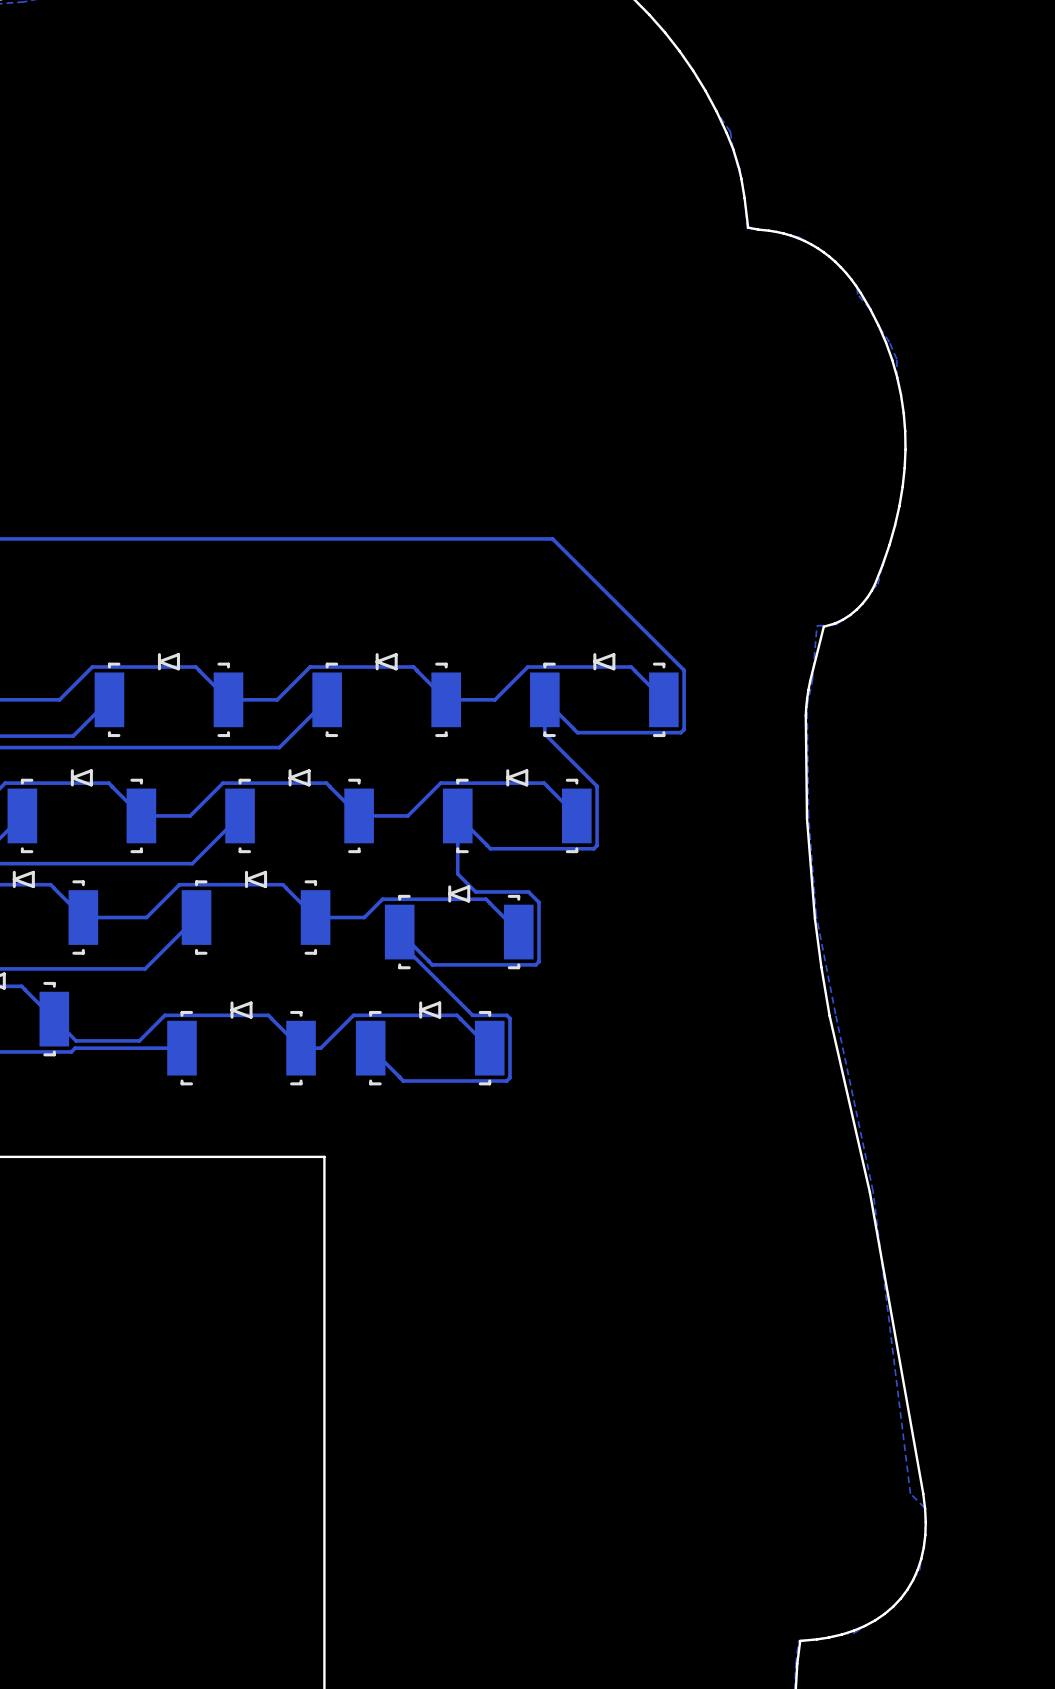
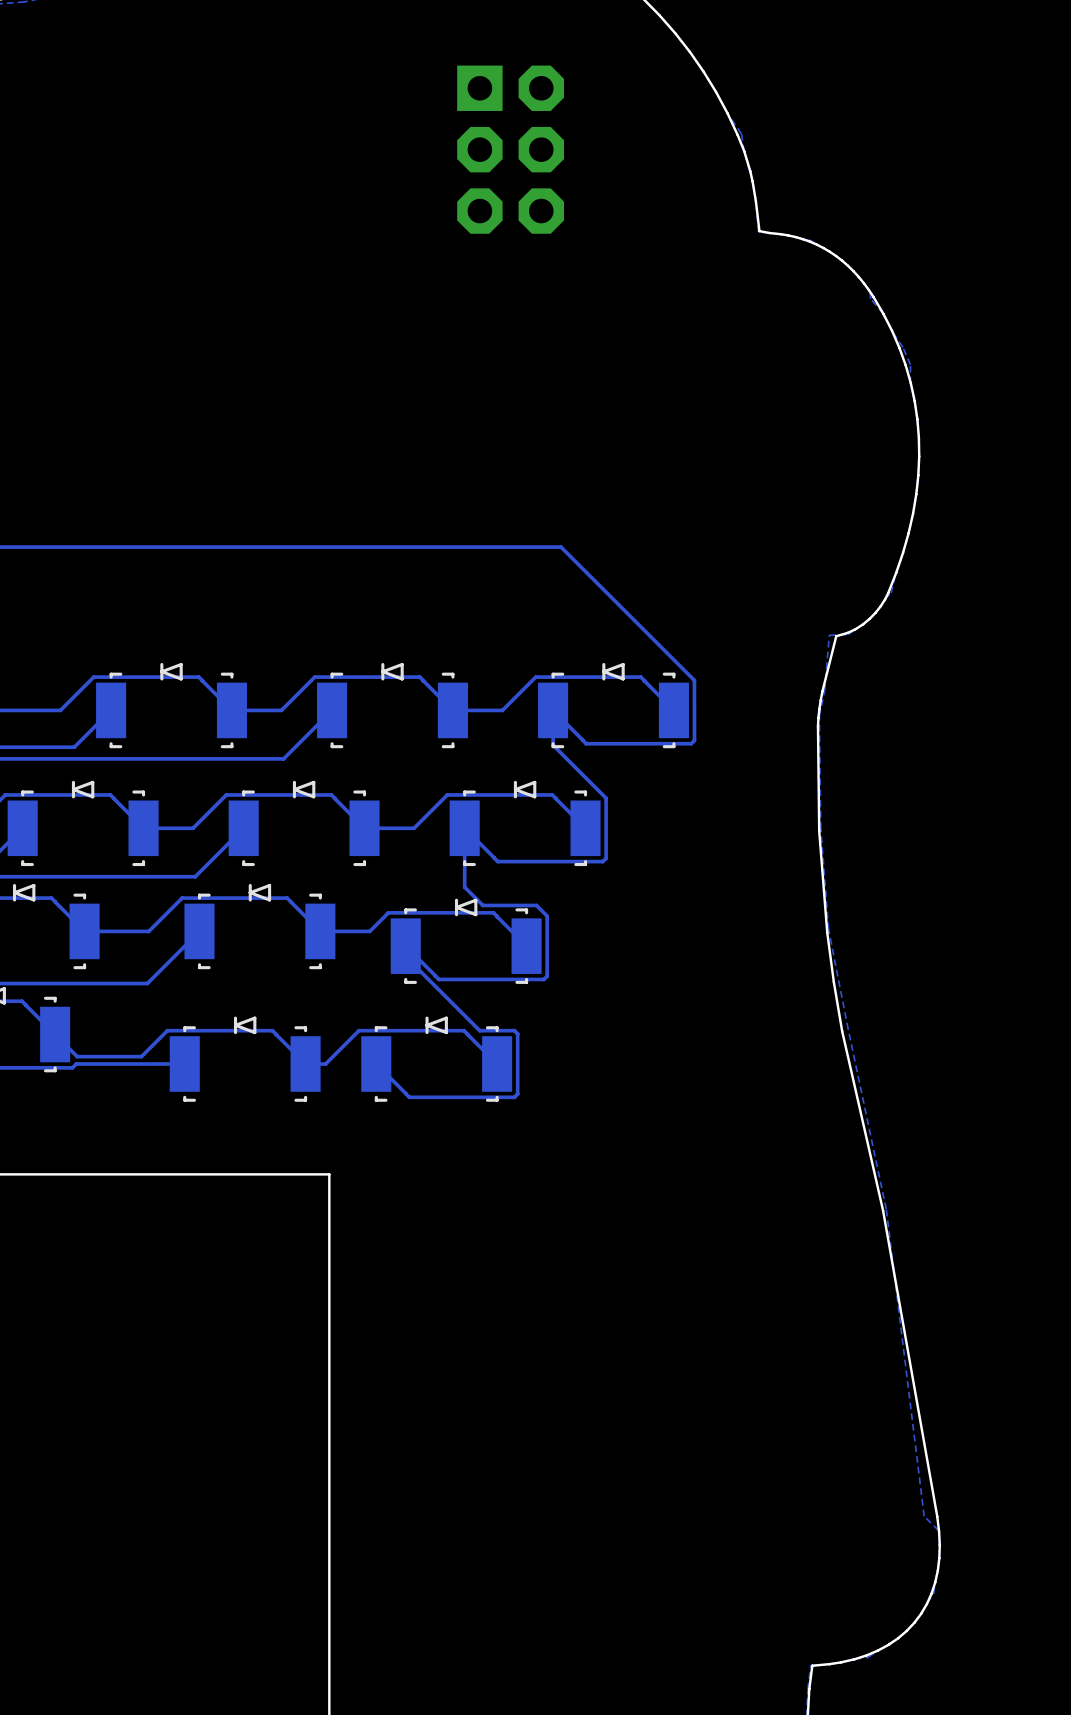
part: none -> (510, 149)

